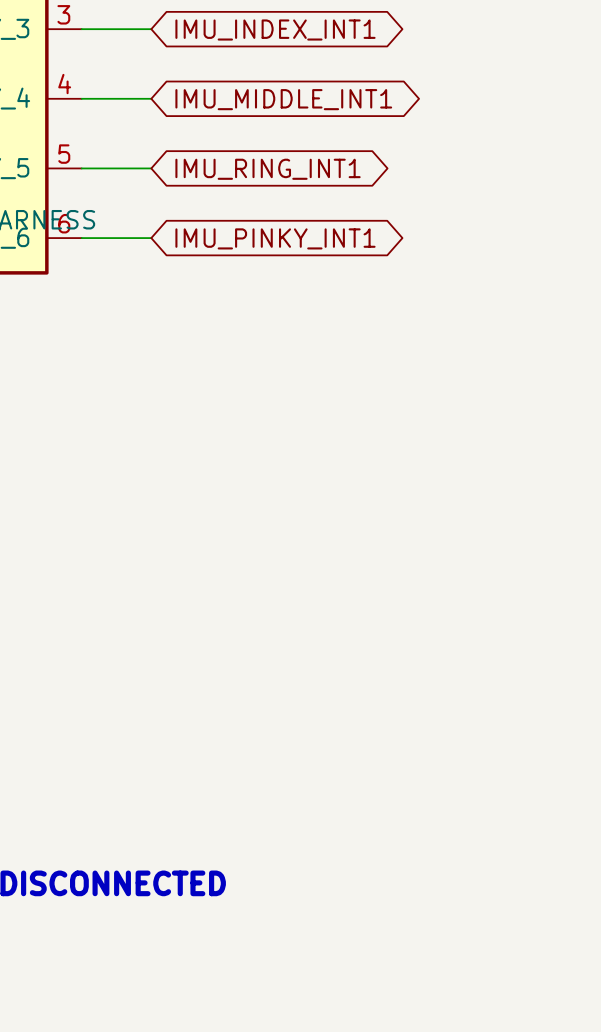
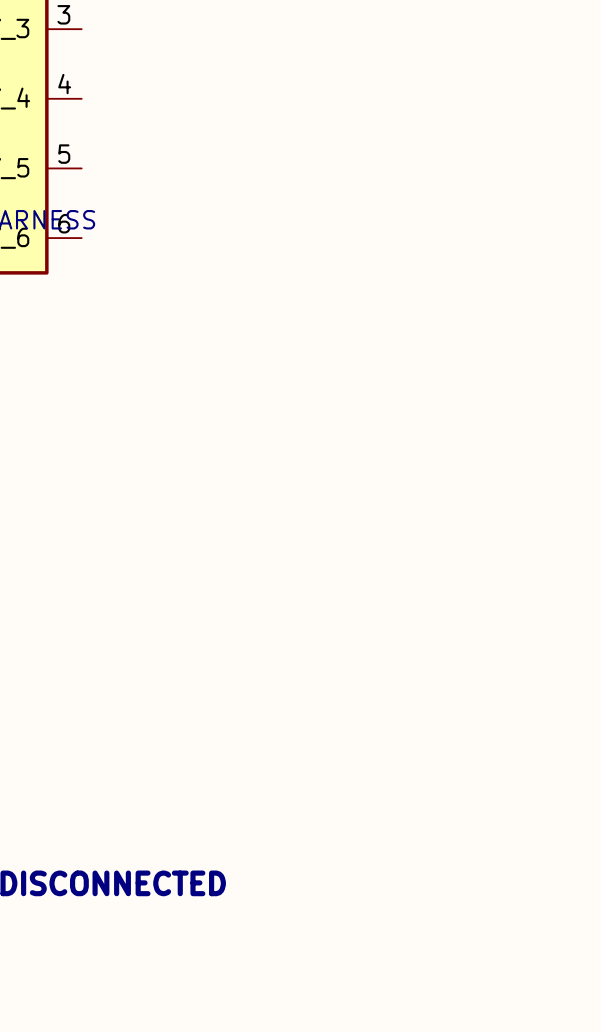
wire: (81, 29) (151, 29) -> none
global label: IMU_INDEX_INT1 (275, 30) -> none
wire: (81, 98) (151, 98) -> none
global label: IMU_MIDDLE_INT1 (283, 99) -> none
wire: (81, 168) (151, 168) -> none
global label: IMU_RING_INT1 (268, 169) -> none
wire: (81, 238) (151, 238) -> none
global label: IMU_PINKY_INT1 (275, 238) -> none

